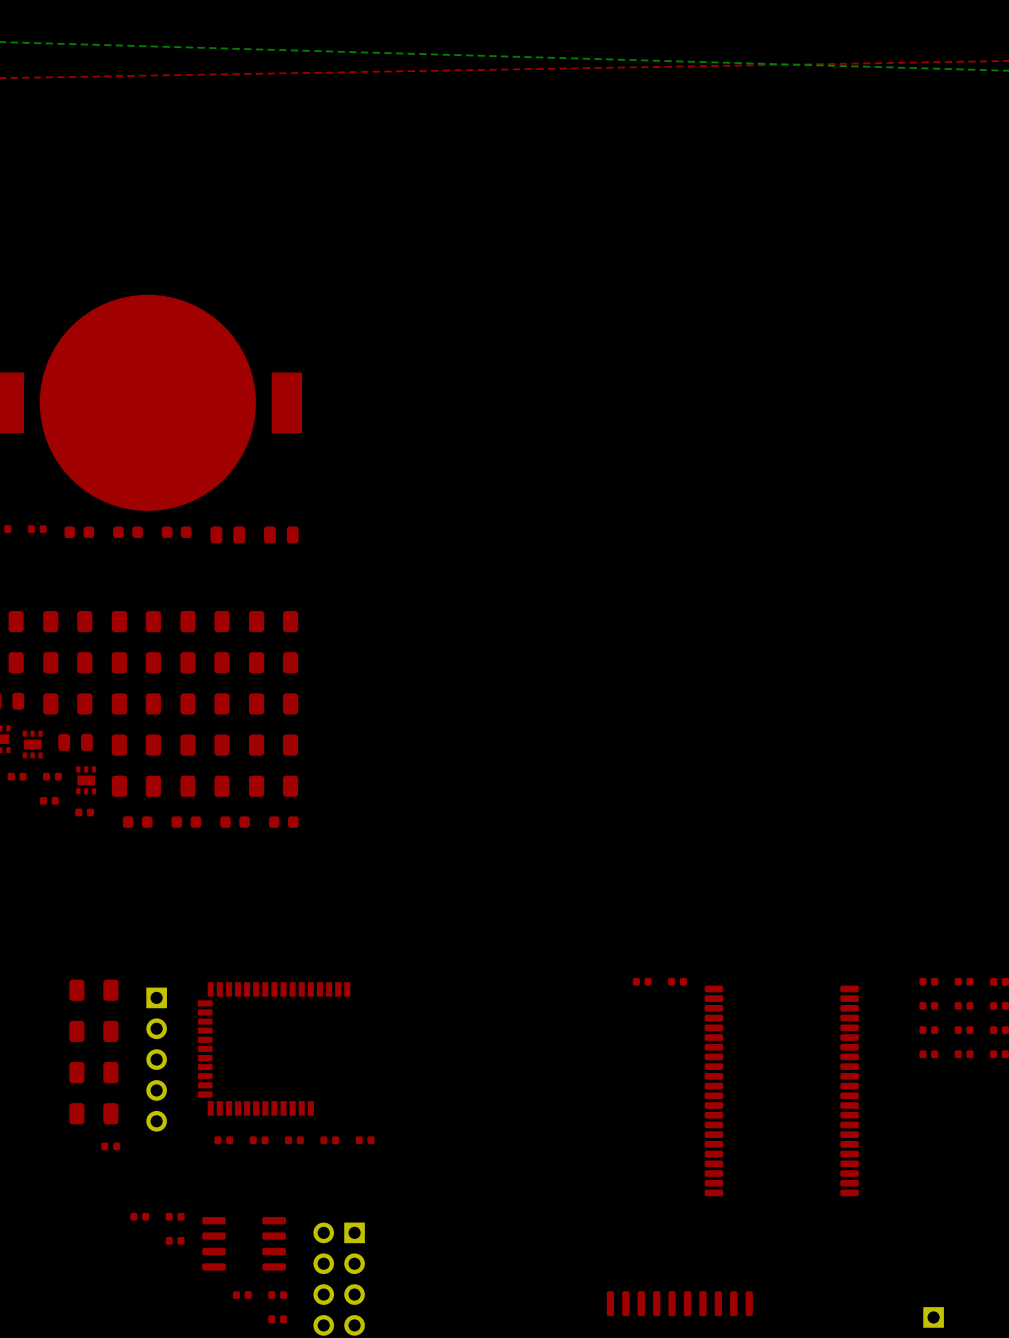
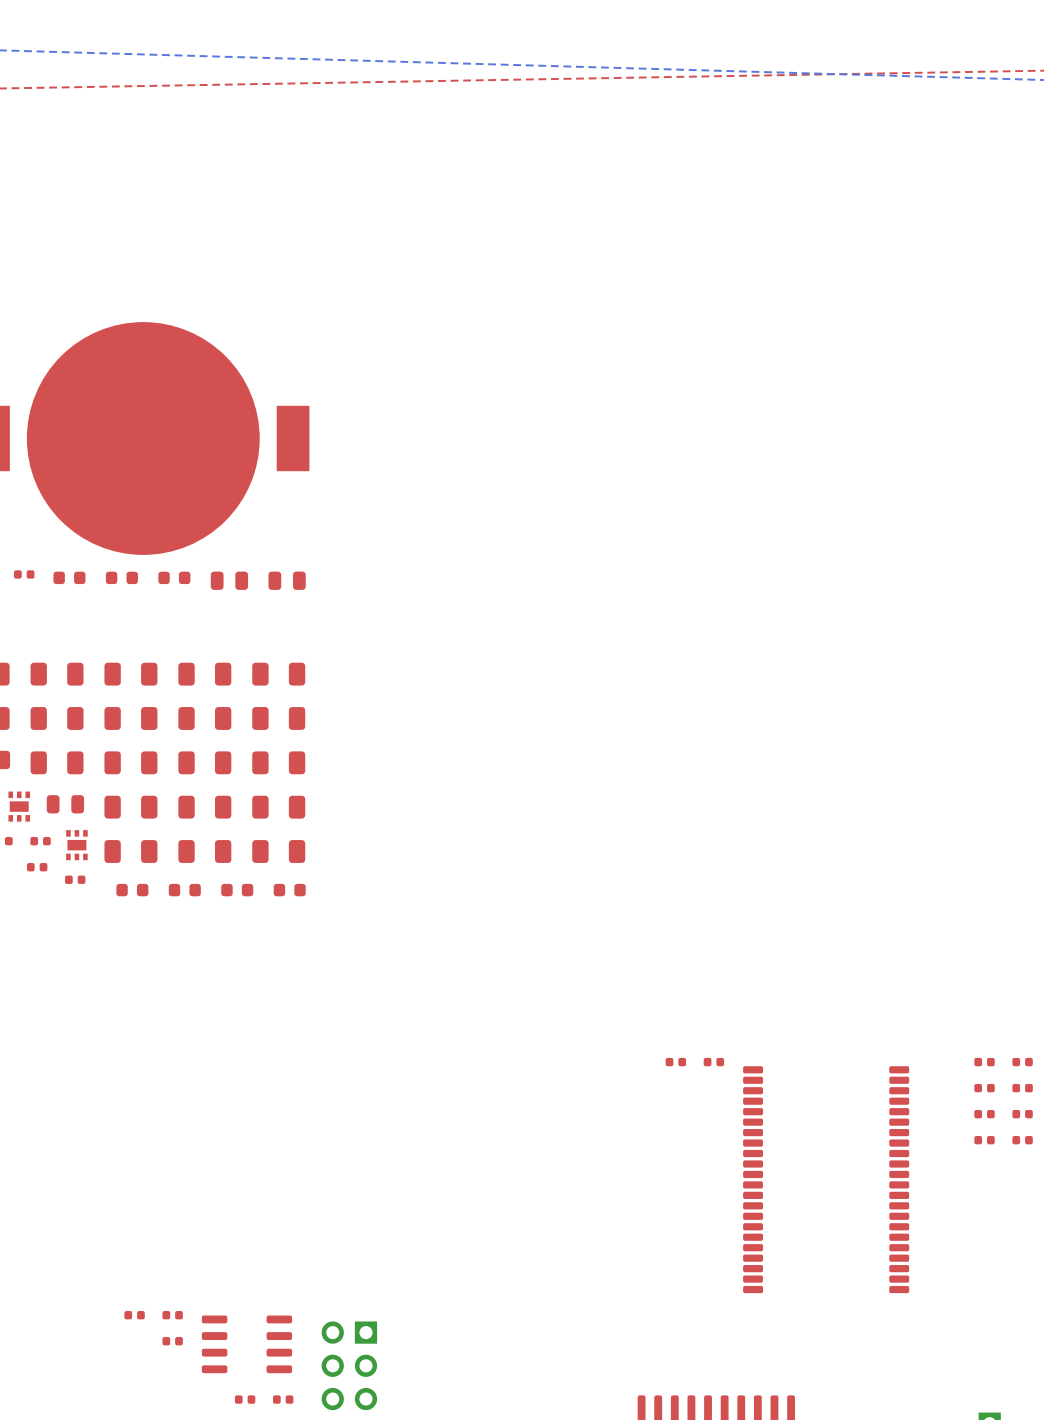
part: (93, 990) -> none
part: (93, 1031) -> none
part: (274, 1048) -> none
part: (156, 1059) -> none
part: (93, 1072) -> none
part: (93, 1113) -> none
part: (223, 1140) -> none
part: (259, 1140) -> none
part: (294, 1140) -> none
part: (329, 1140) -> none
part: (365, 1140) -> none
part: (110, 1146) -> none

